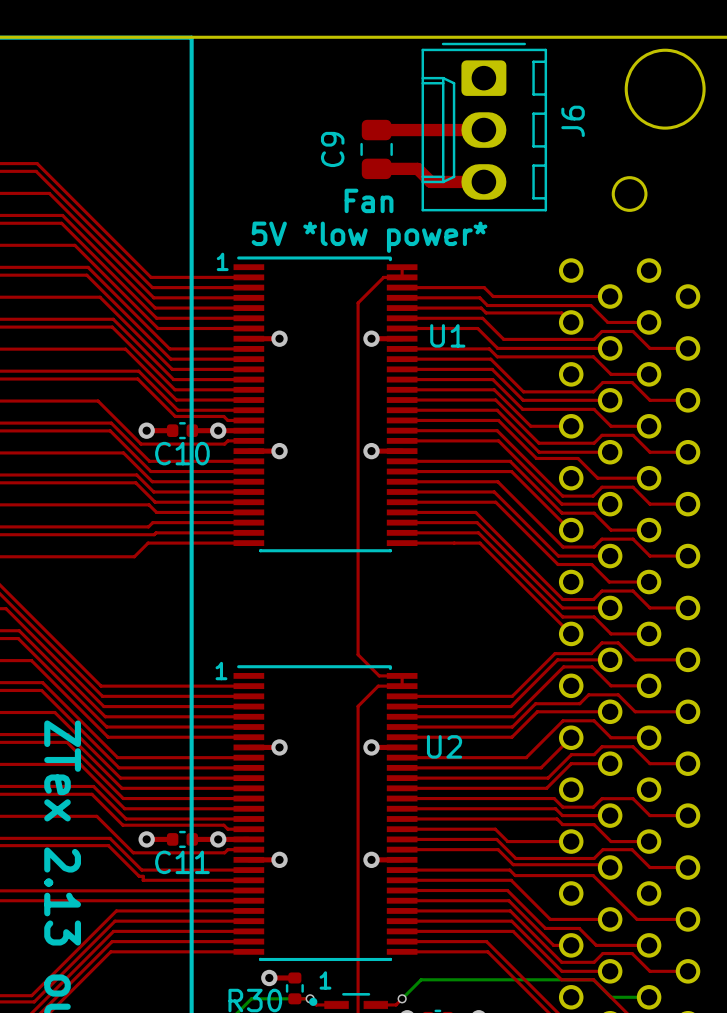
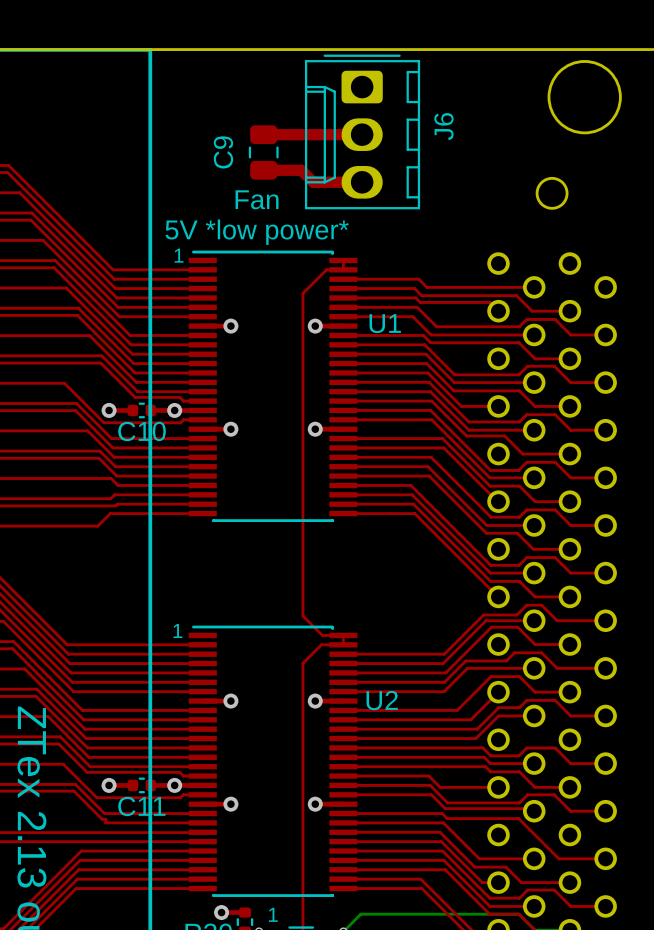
J6 position: (484, 127) -> (362, 131)
top track: (422, 130) (483, 130) -> (263, 134) (319, 134)
C9 position: (376, 149) -> (263, 152)
top track: (376, 168) (417, 168) (430, 181) (483, 181) -> (263, 170) (301, 170) (313, 182) (362, 182)
text position: Fan (369, 200) -> Fan (257, 199)
text position: 5V *low power* (369, 237) -> 5V *low power* (257, 232)

